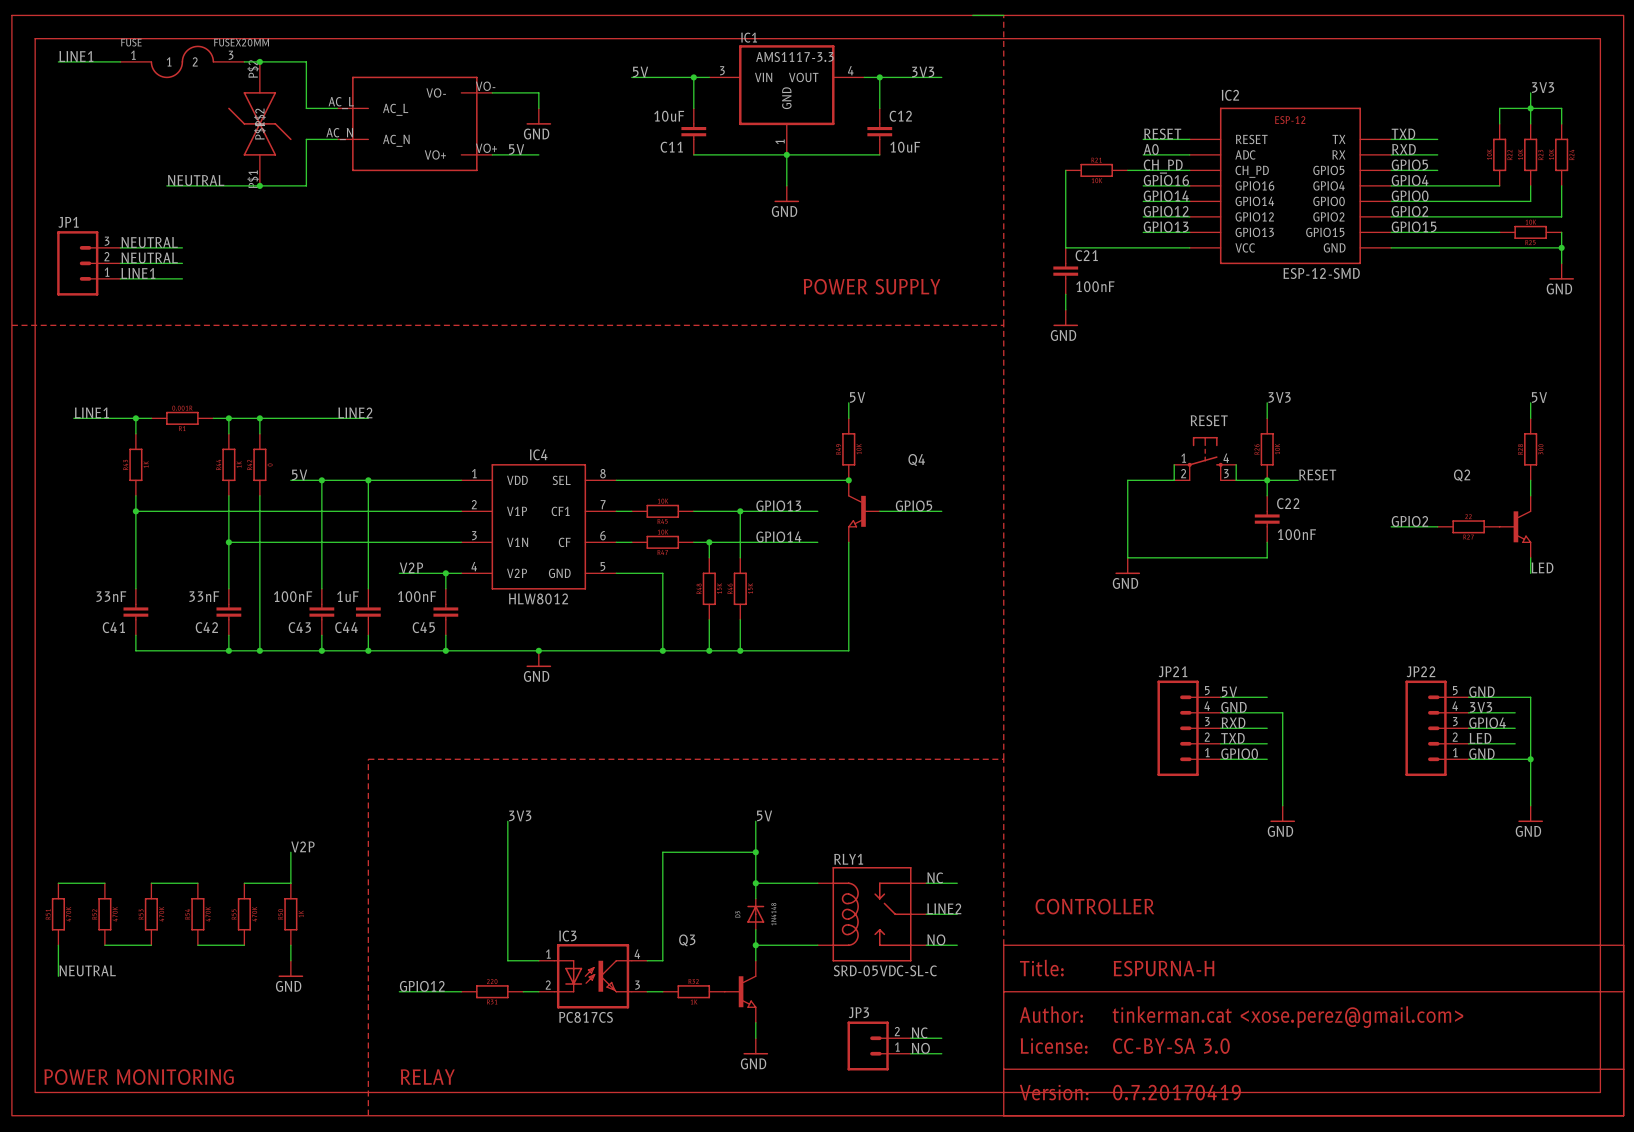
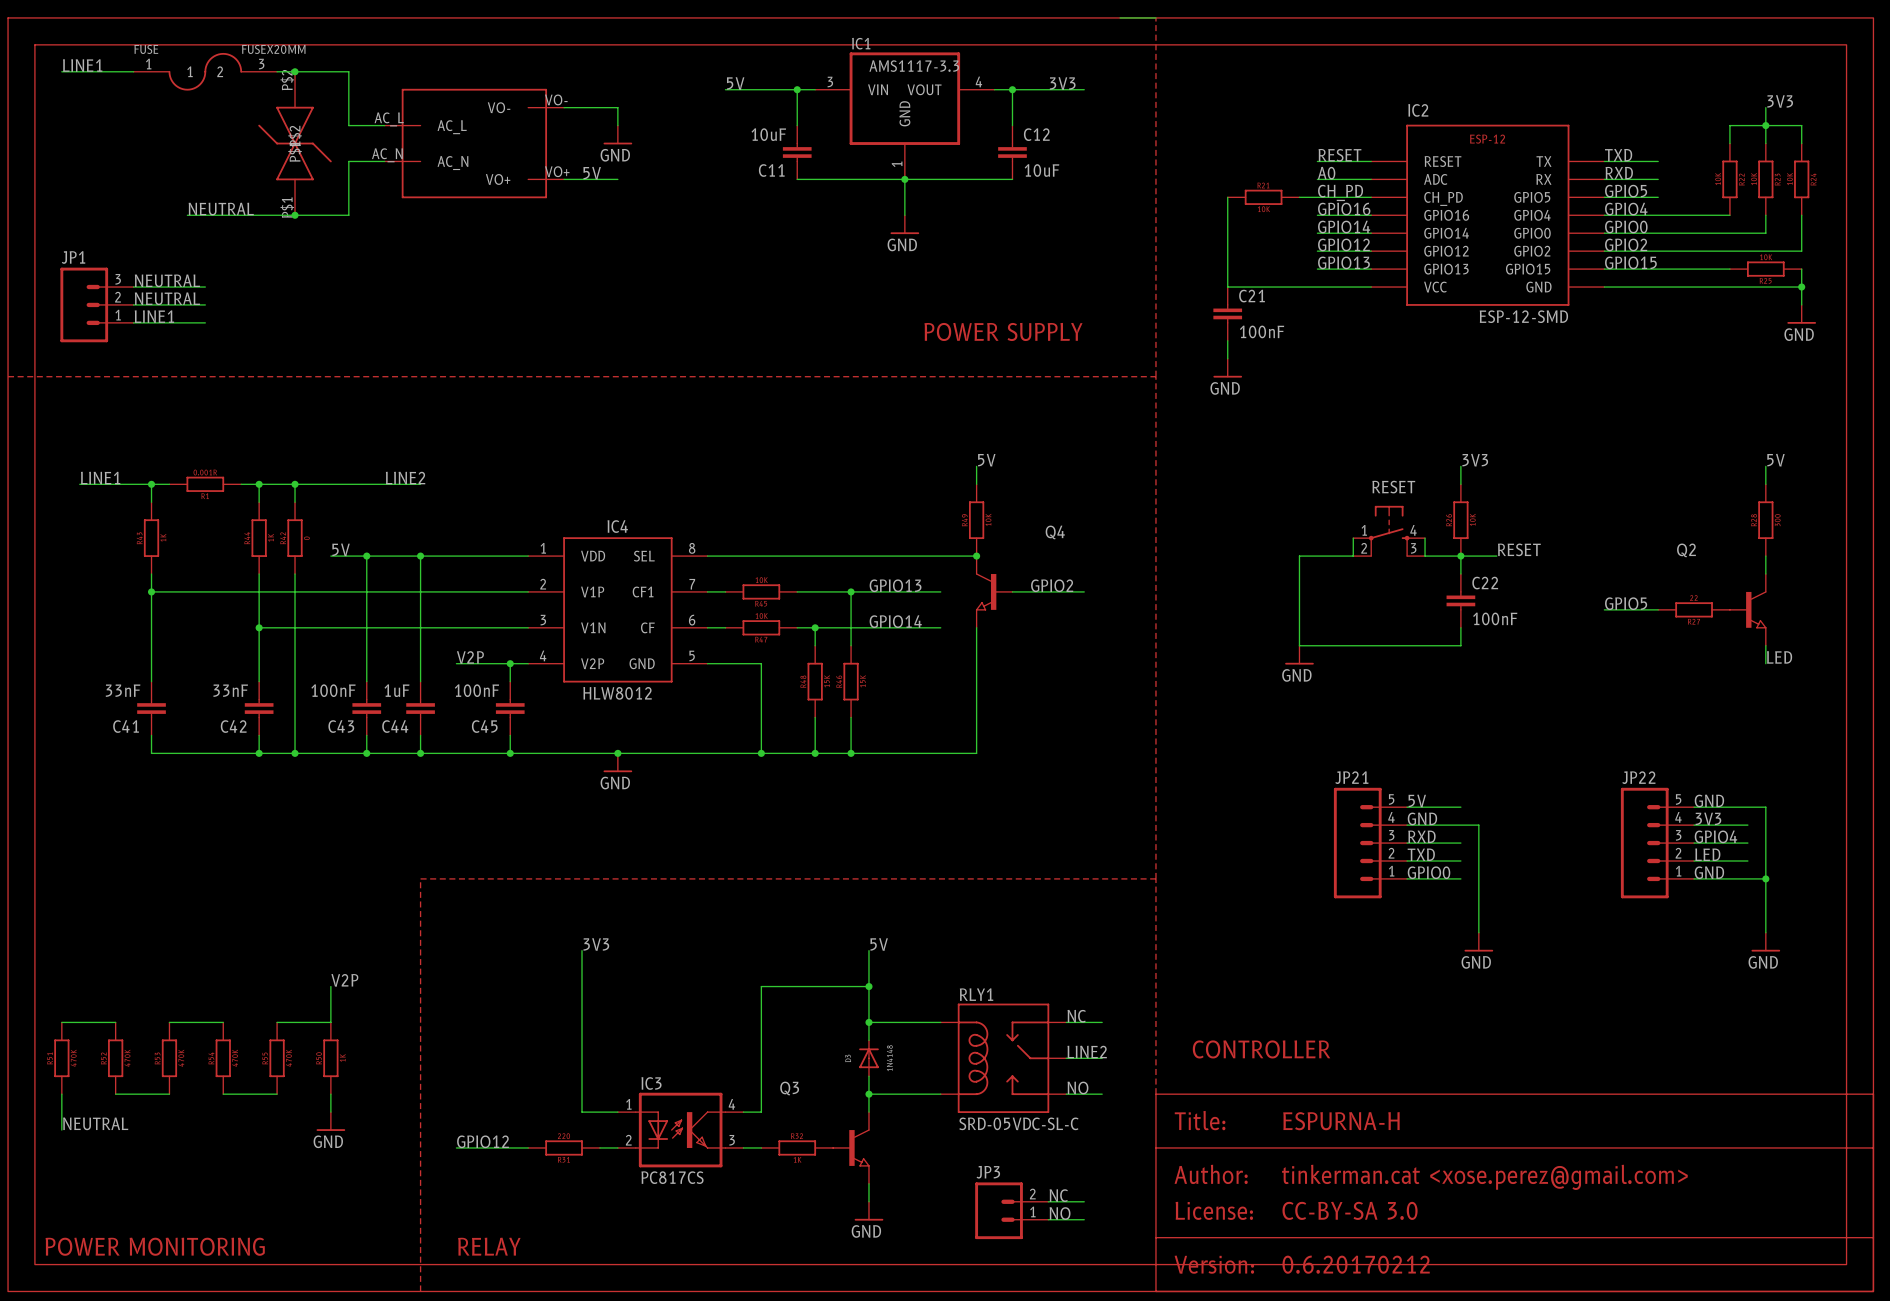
label: GPIO5 (914, 505) -> GPIO2 (1052, 585)
label: GPIO2 (1409, 521) -> GPIO5 (1626, 603)
part text: 0.7.20170419 (1176, 1092) -> 0.6.20170212 (1356, 1264)

